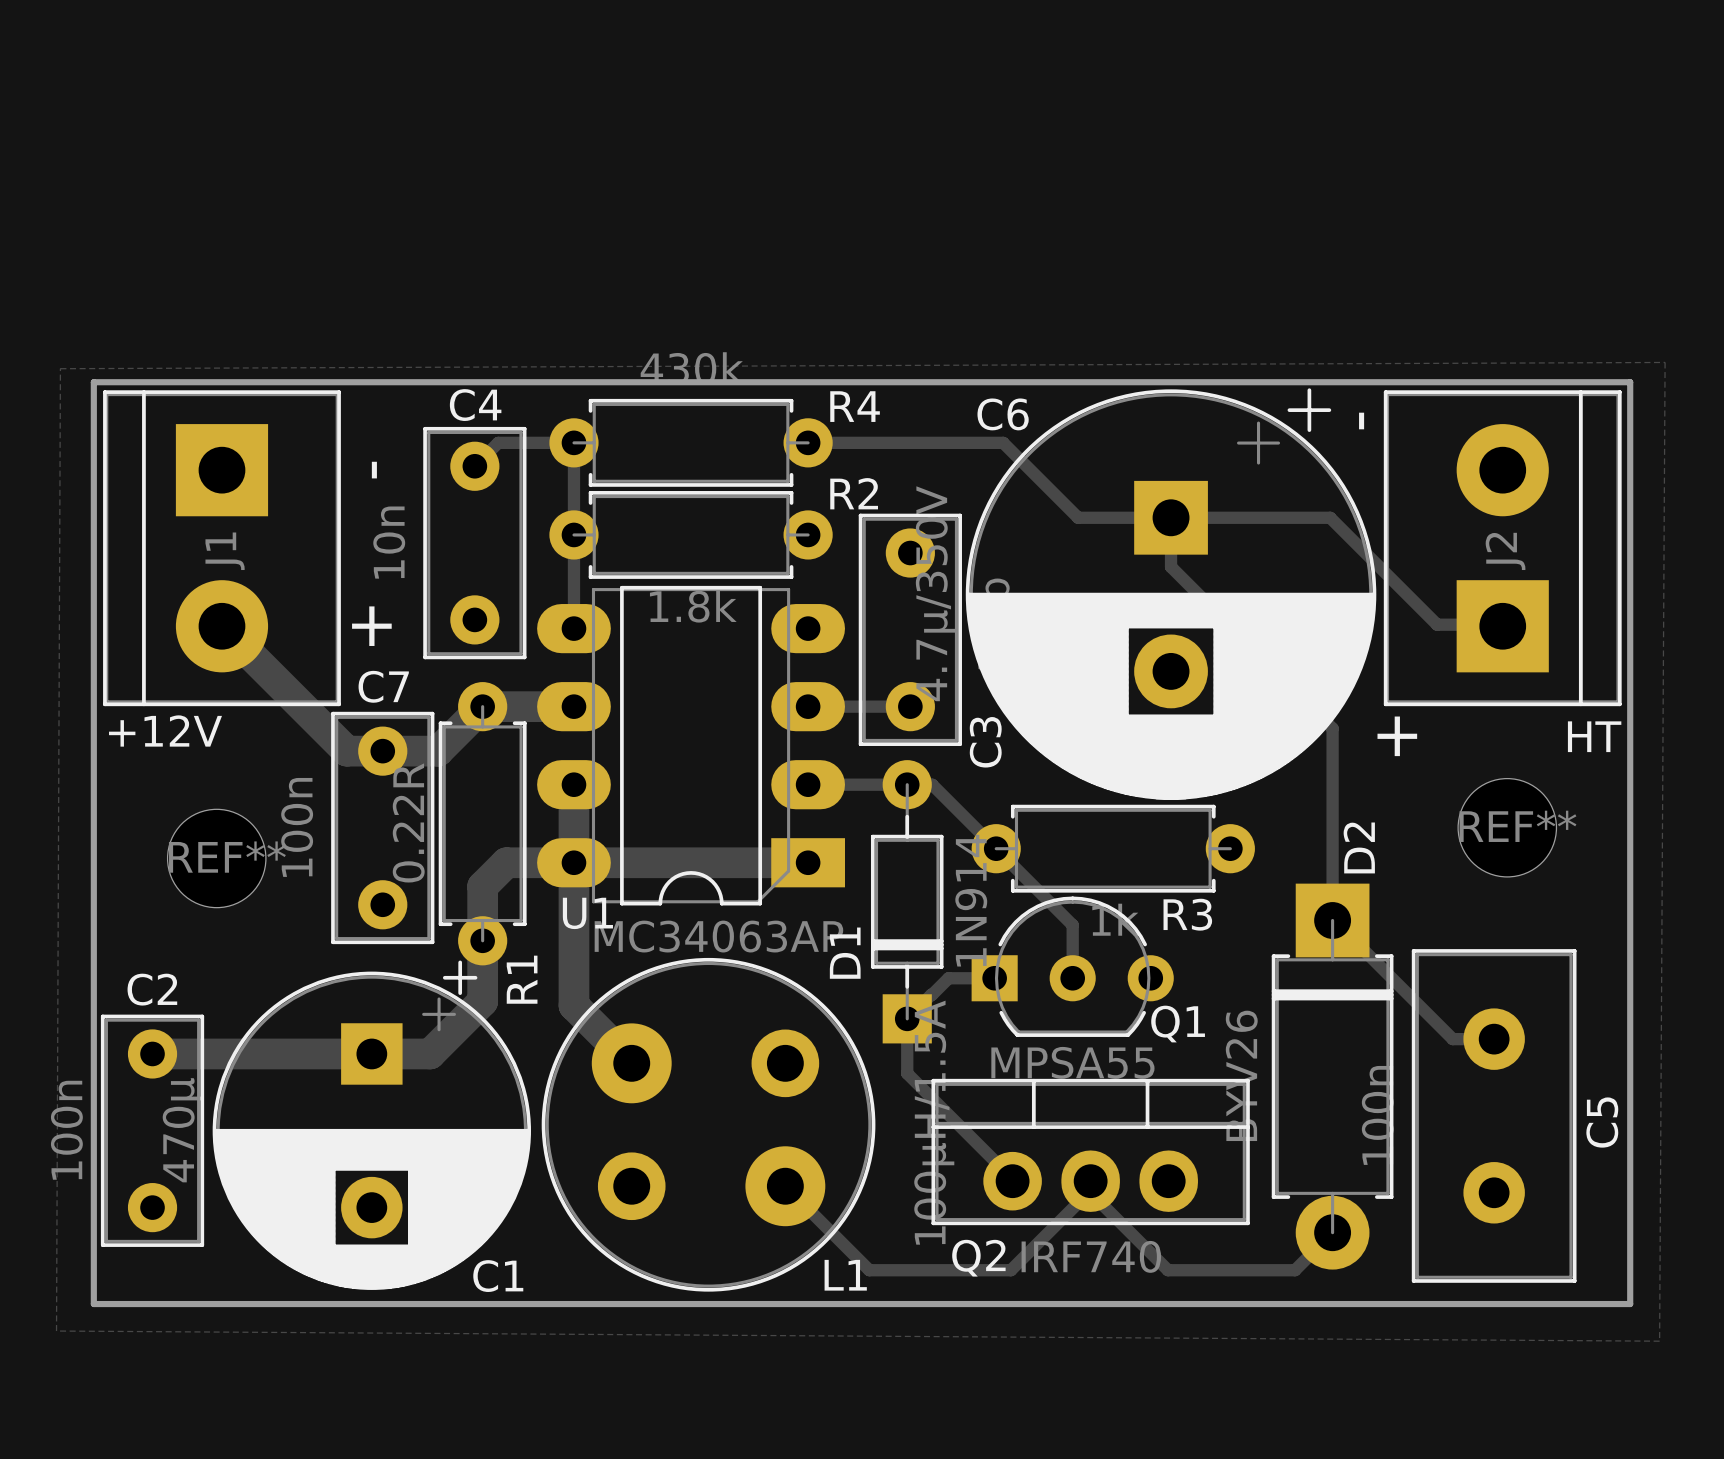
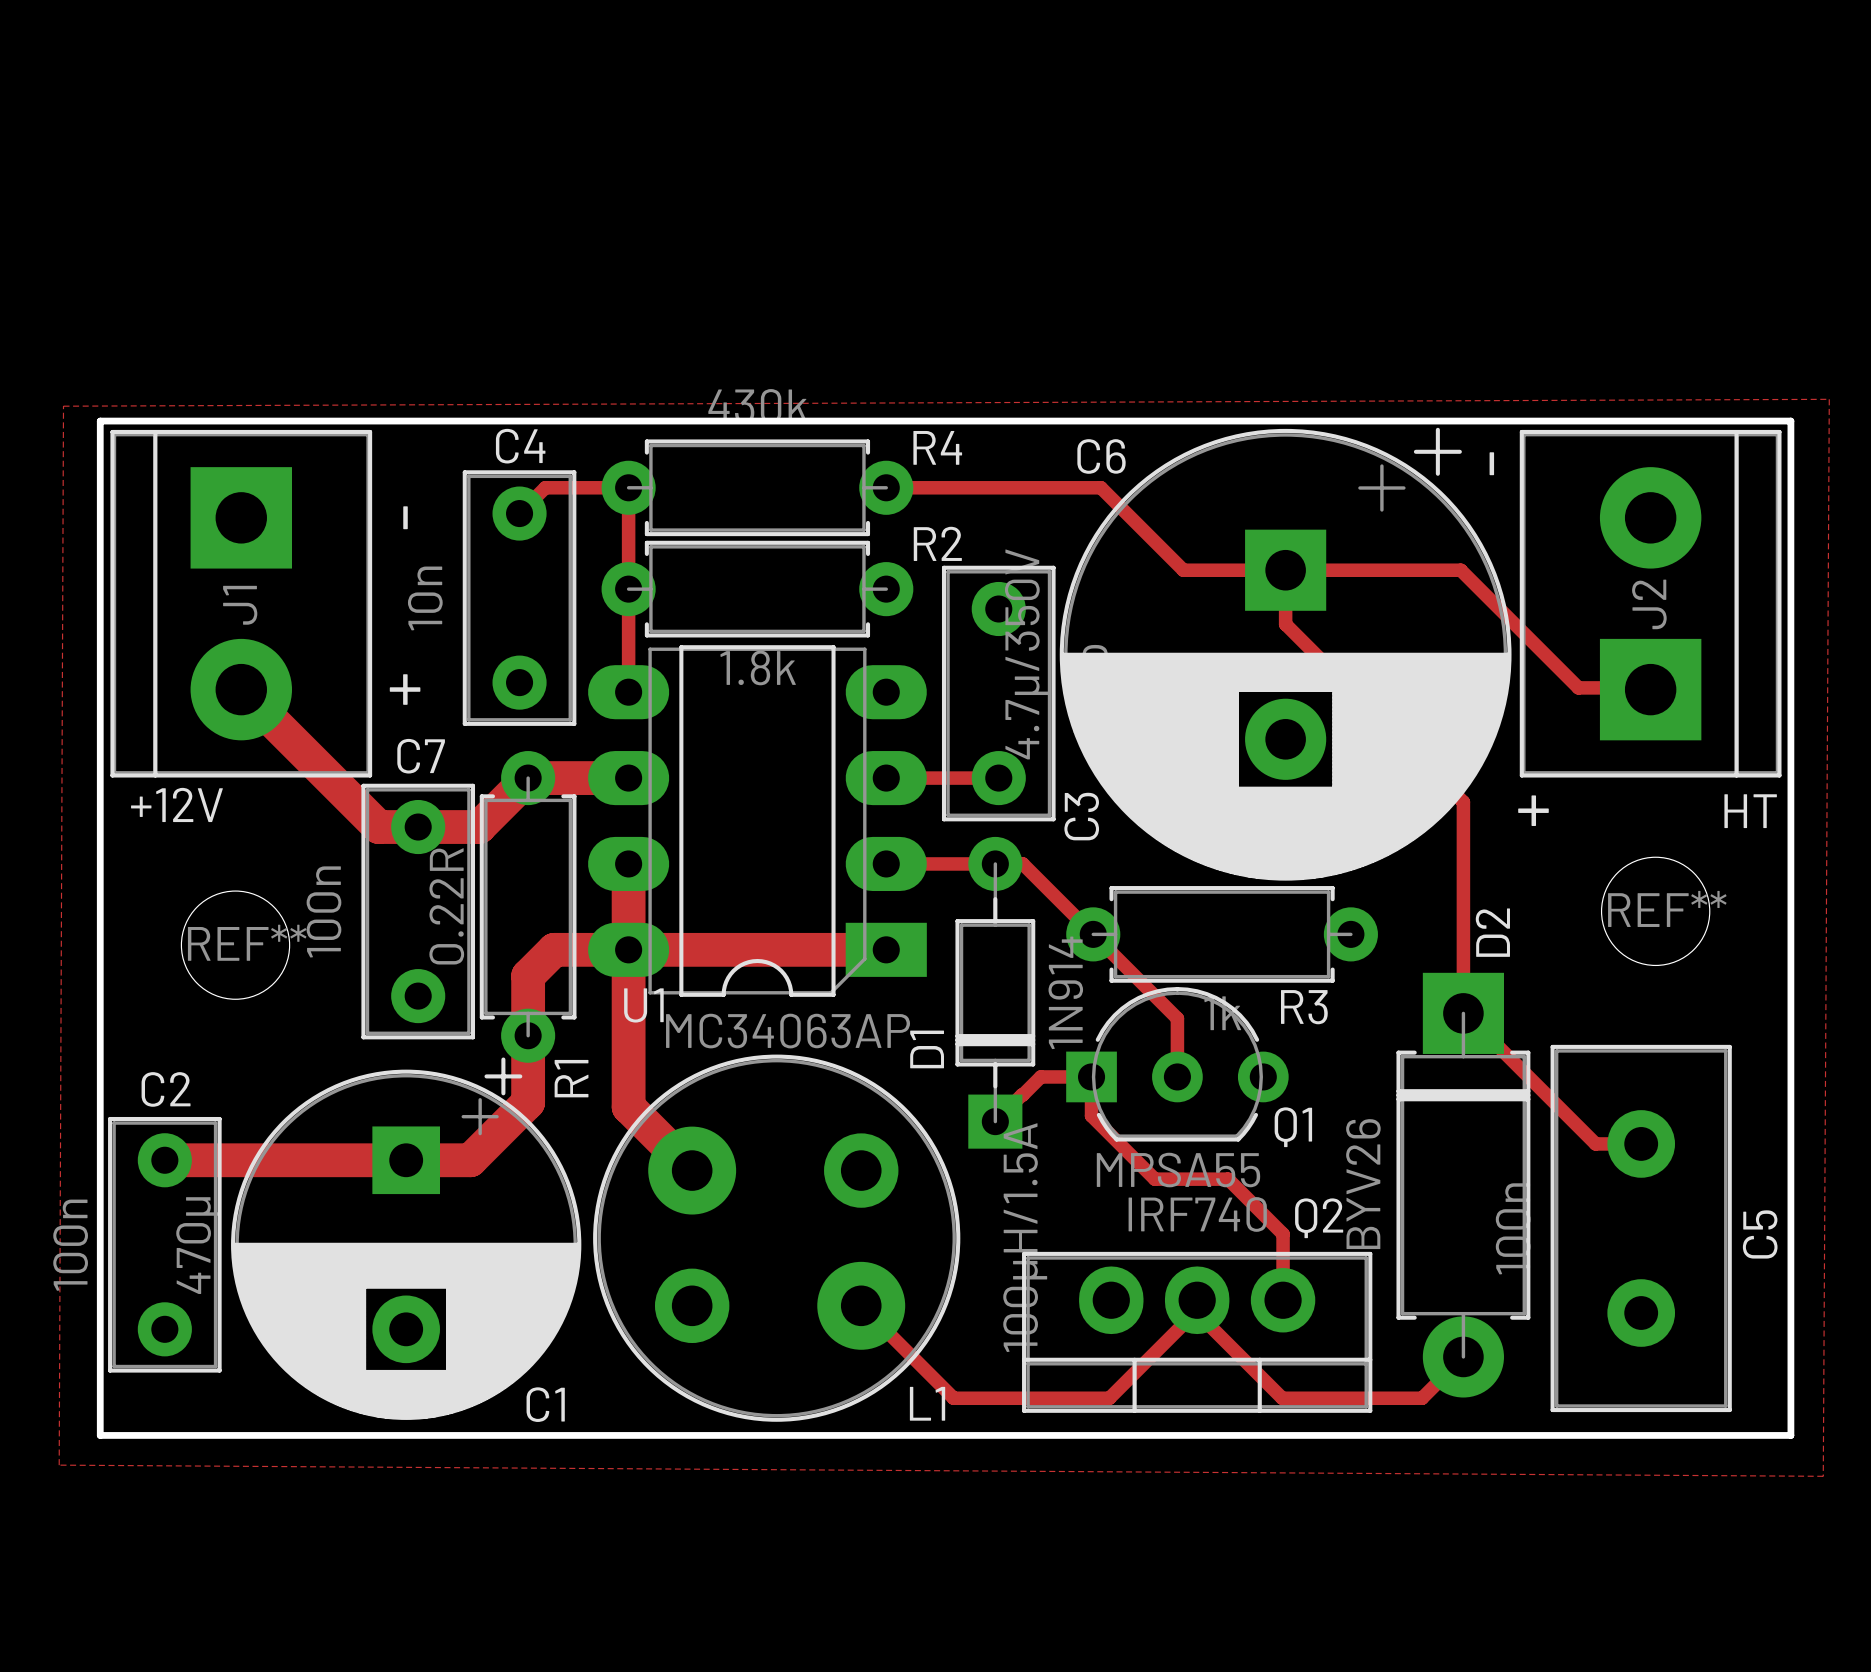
track: none -> (1091, 1076) (1091, 1115) (1154, 1179) (1228, 1179) (1283, 1234) (1283, 1300)
track: (907, 1018) (907, 1073) (1012, 1178) (1012, 1181) -> none
Q2 rotation: 0° (1090, 1152) -> 180° (1197, 1332)

